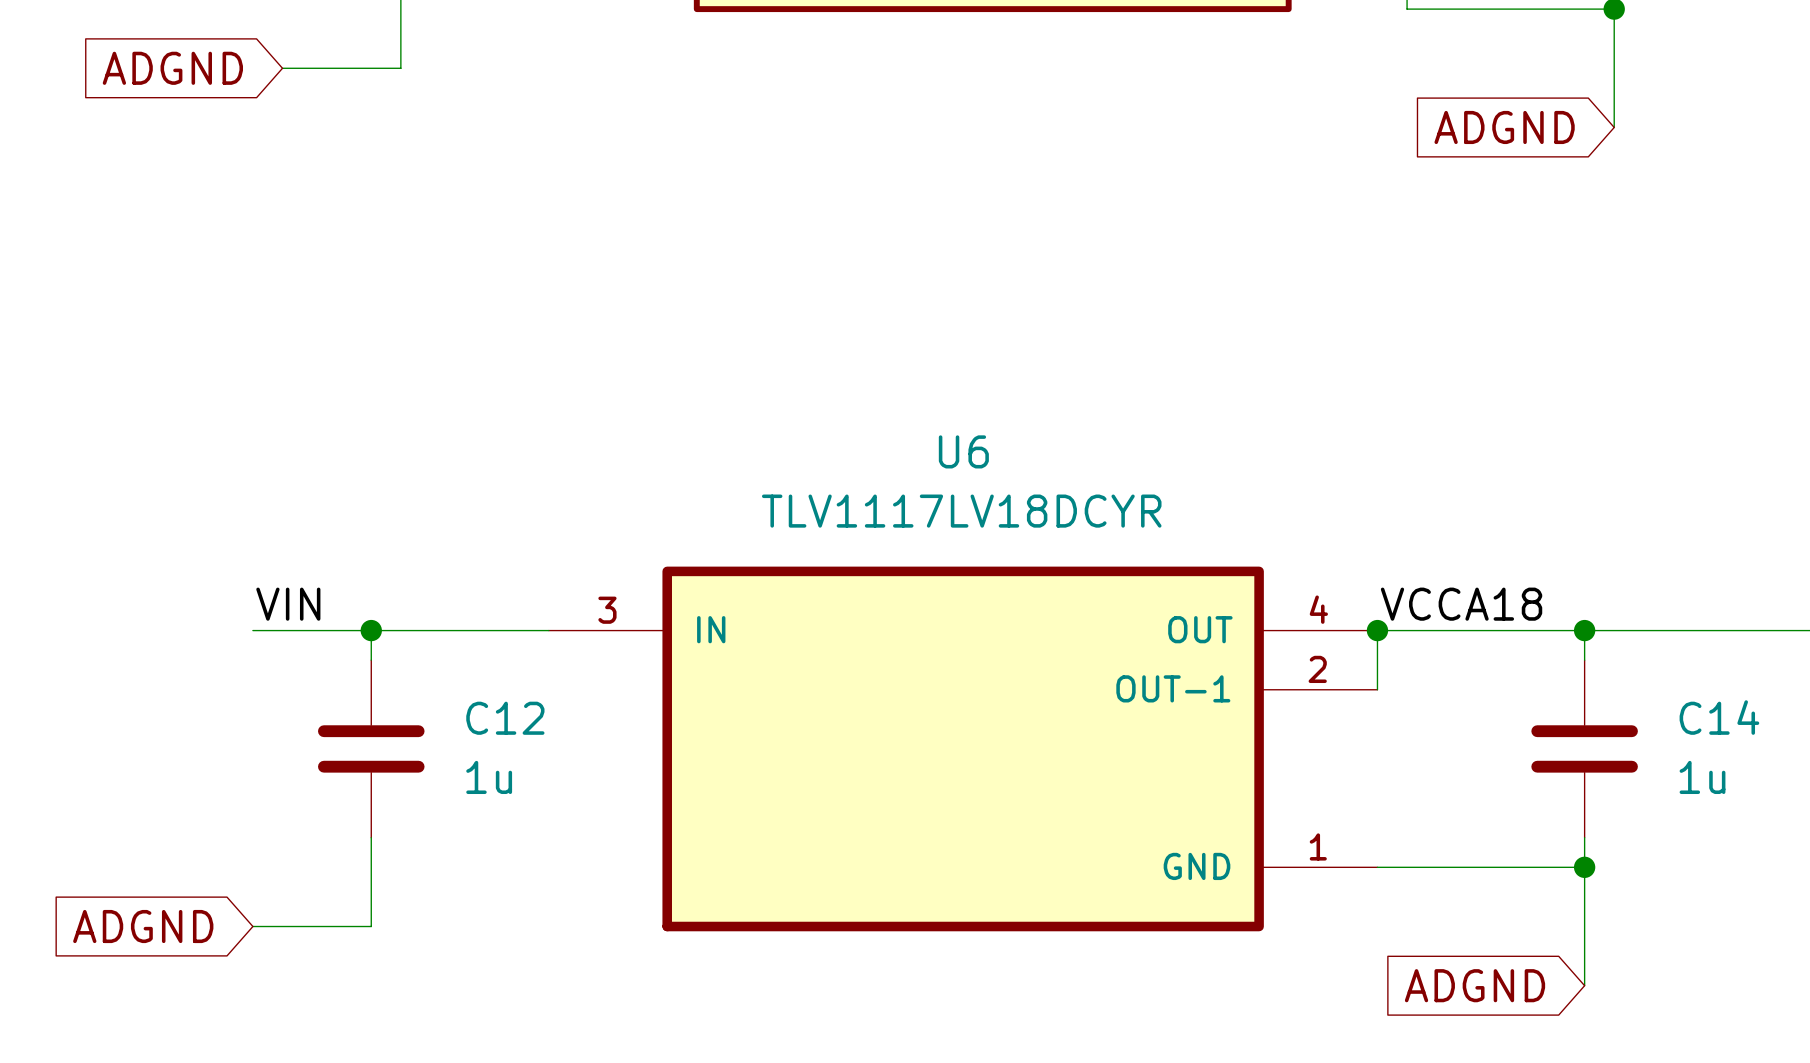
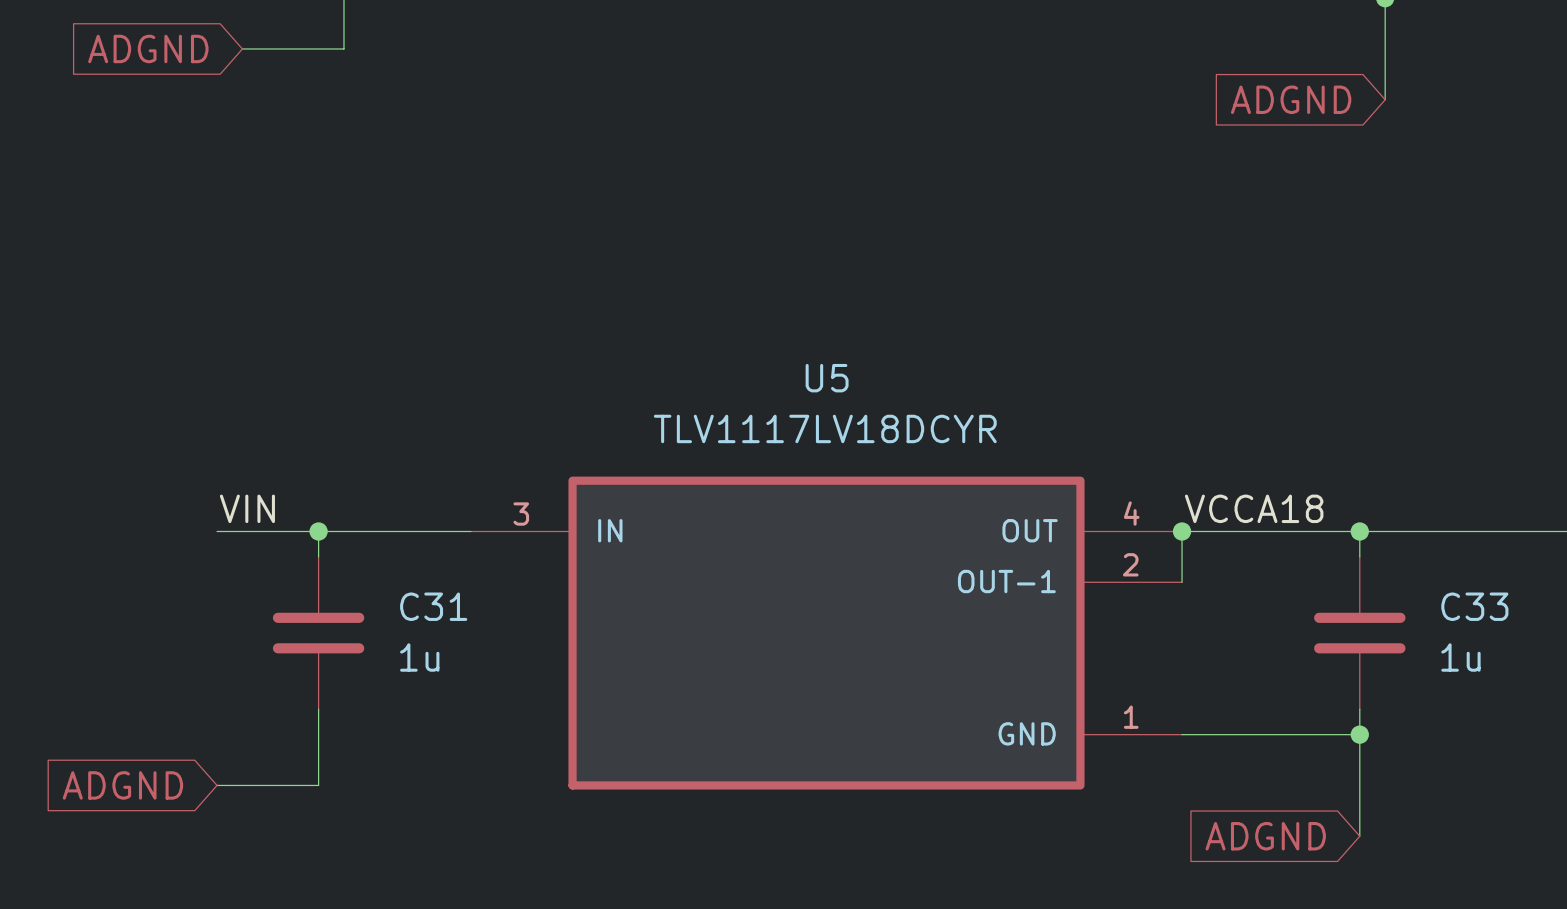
U6 name: U6 (963, 451) -> U5 (827, 378)
C14 name: C14 (1719, 717) -> C33 (1474, 606)
C12 name: C12 (505, 718) -> C31 (433, 606)

